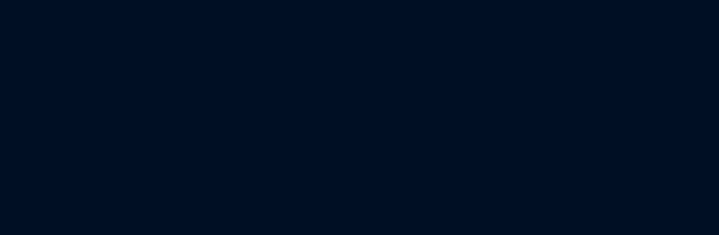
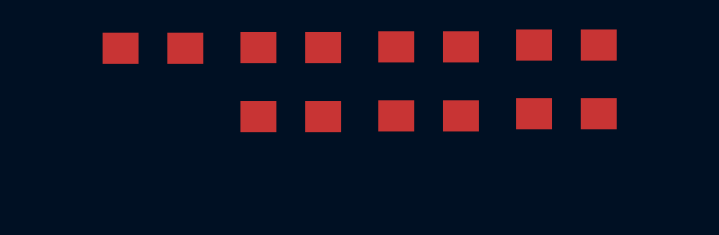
part: none -> (566, 45)
part: none -> (428, 46)
part: none -> (290, 47)
part: none -> (152, 48)
part: none -> (566, 113)
part: none -> (428, 115)
part: none -> (290, 116)

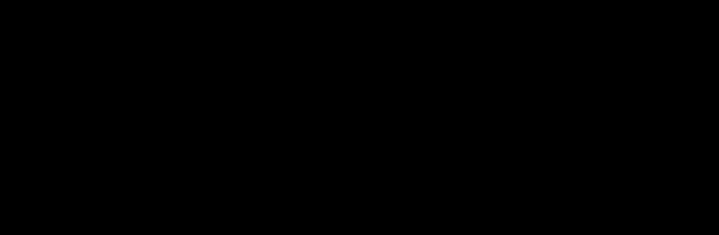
part: (566, 45) -> none
part: (428, 46) -> none
part: (290, 47) -> none
part: (152, 48) -> none
part: (566, 113) -> none
part: (428, 115) -> none
part: (290, 116) -> none

